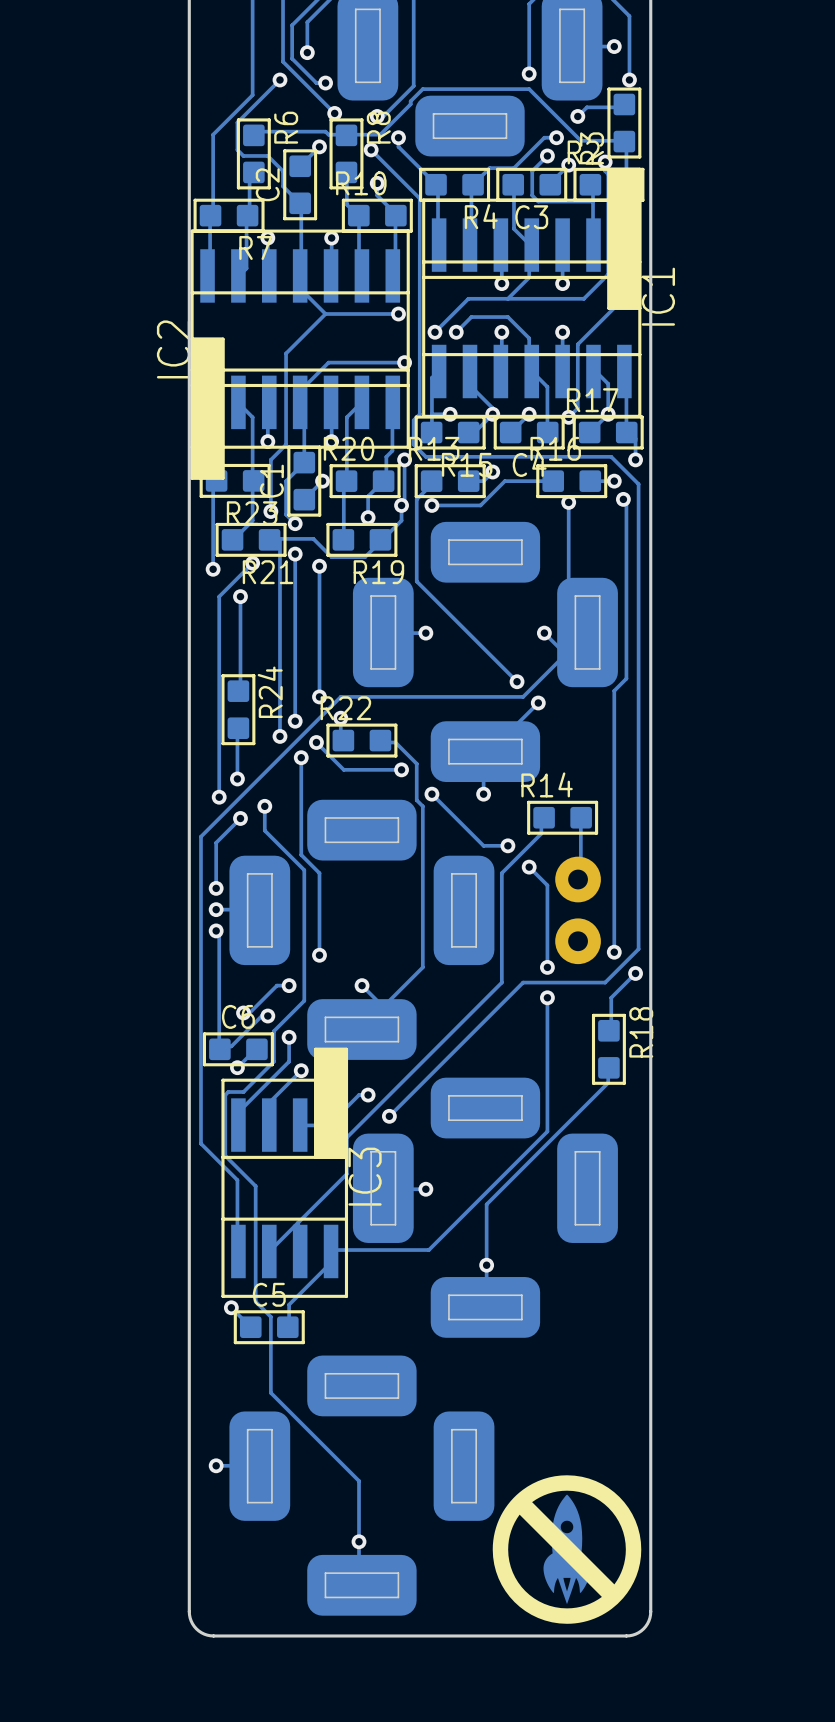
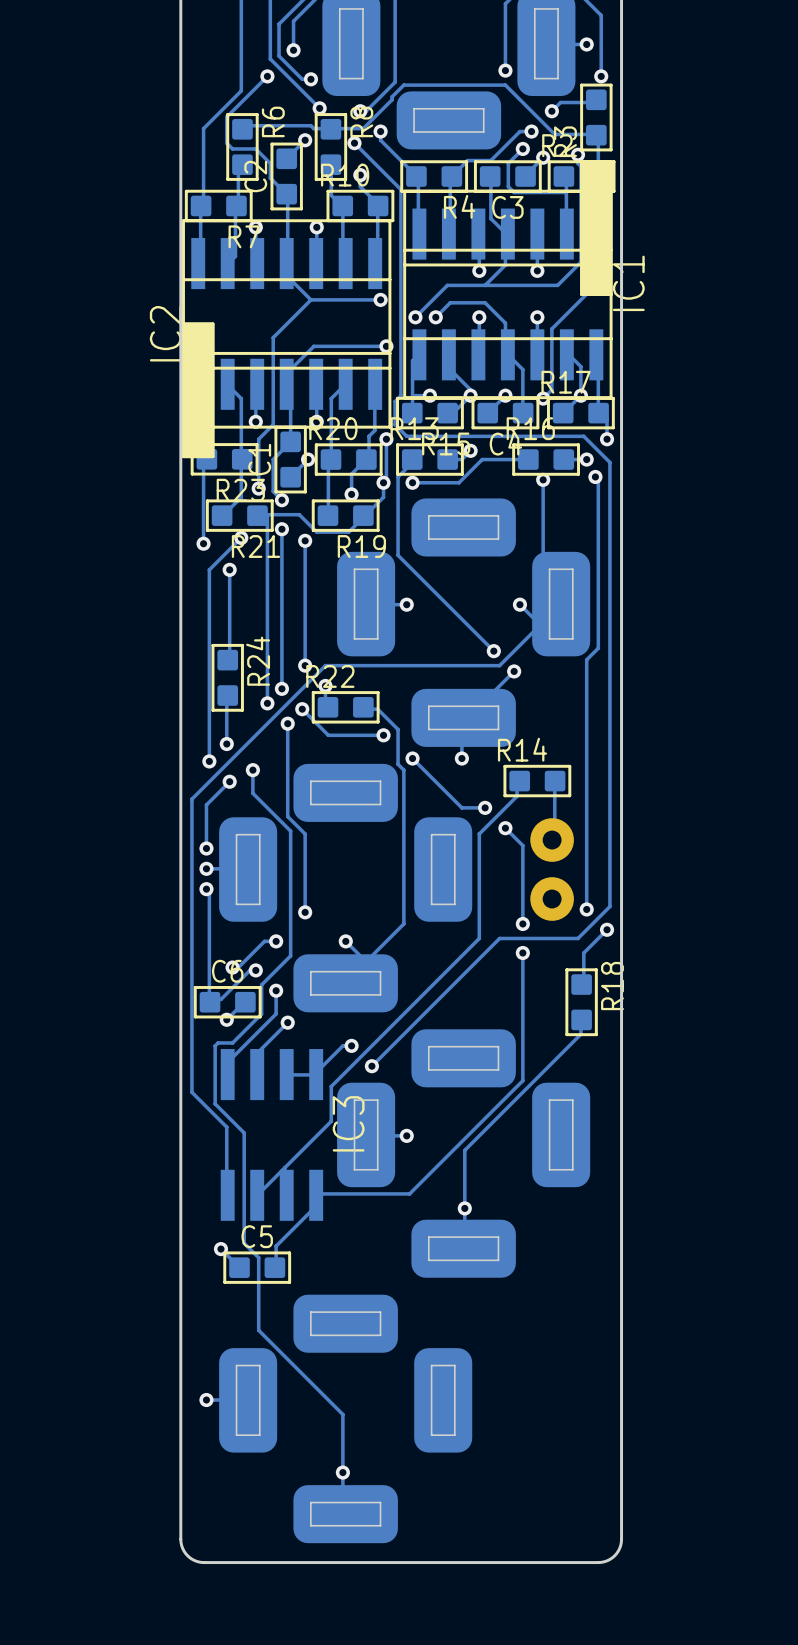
IC3 footprint: [221, 1047, 349, 1298] -> [220, 1049, 324, 1221]
drawing: [492, 1475, 642, 1624] -> none

